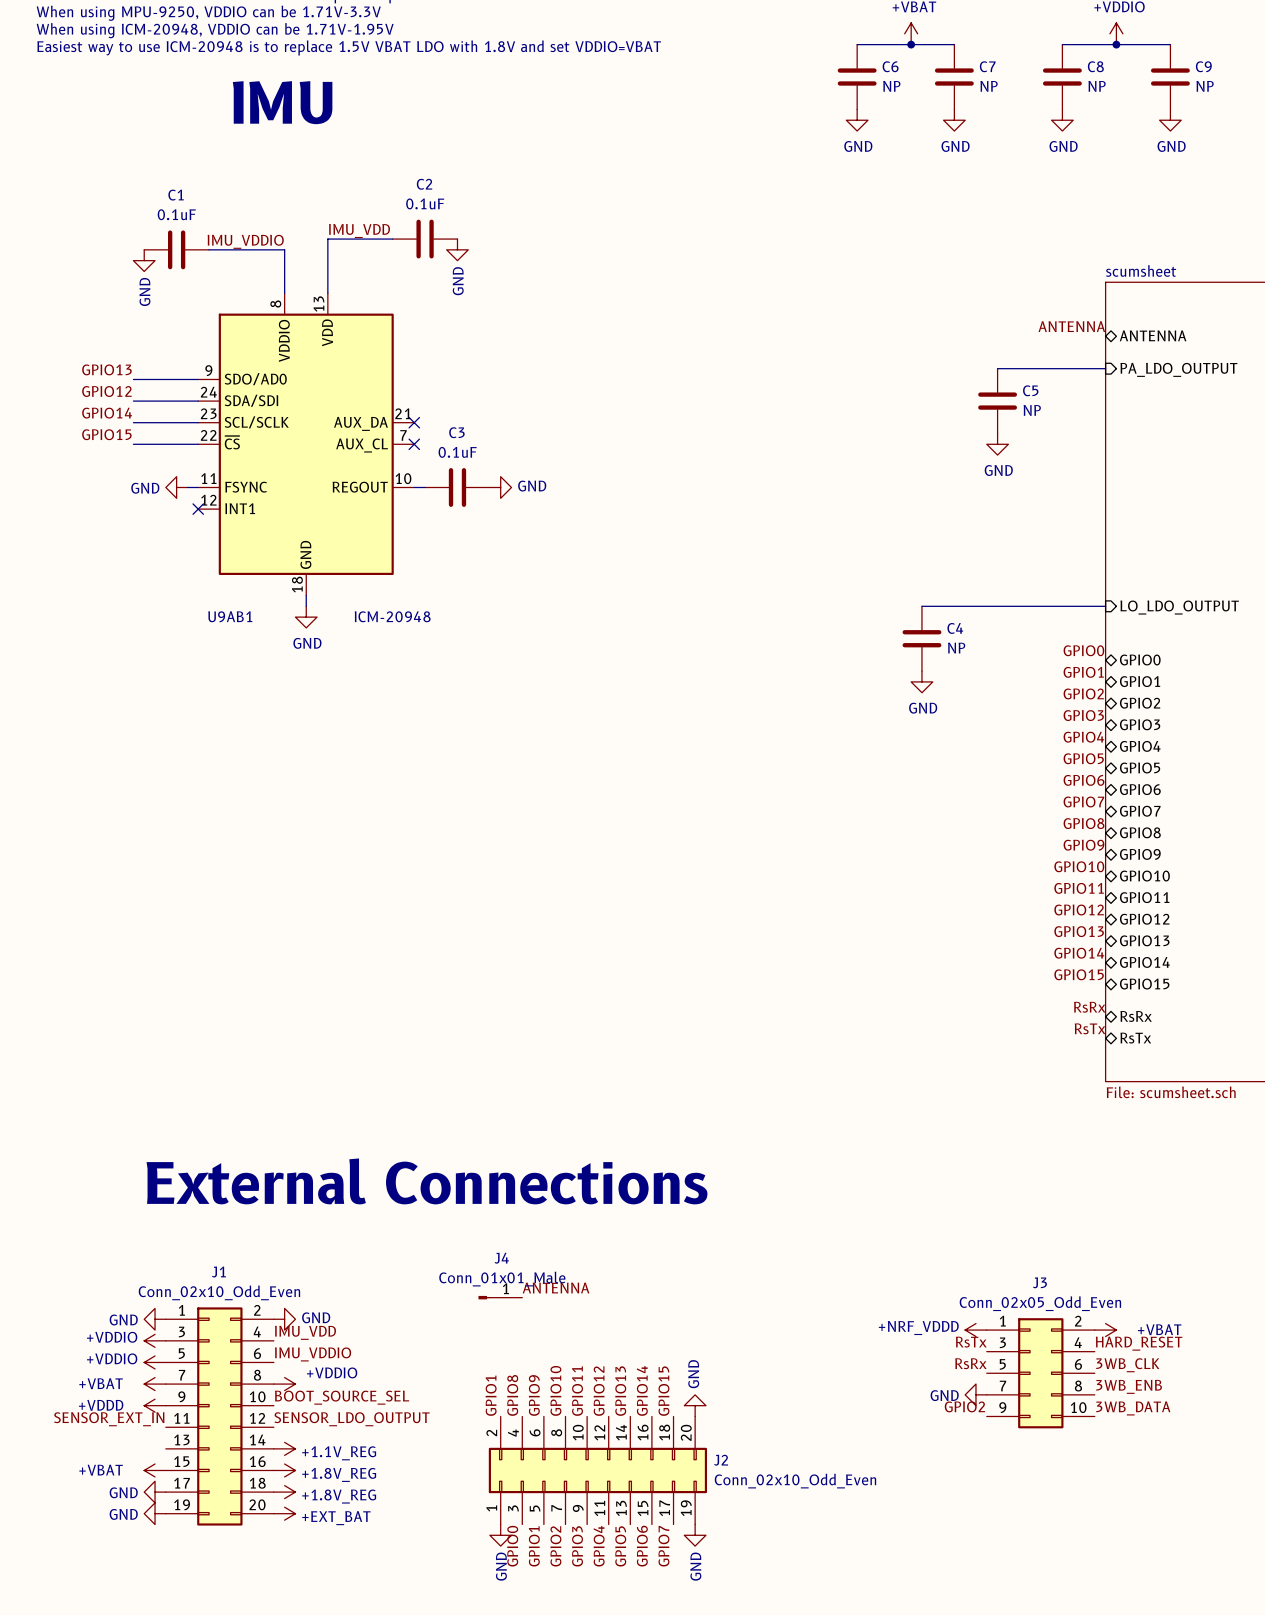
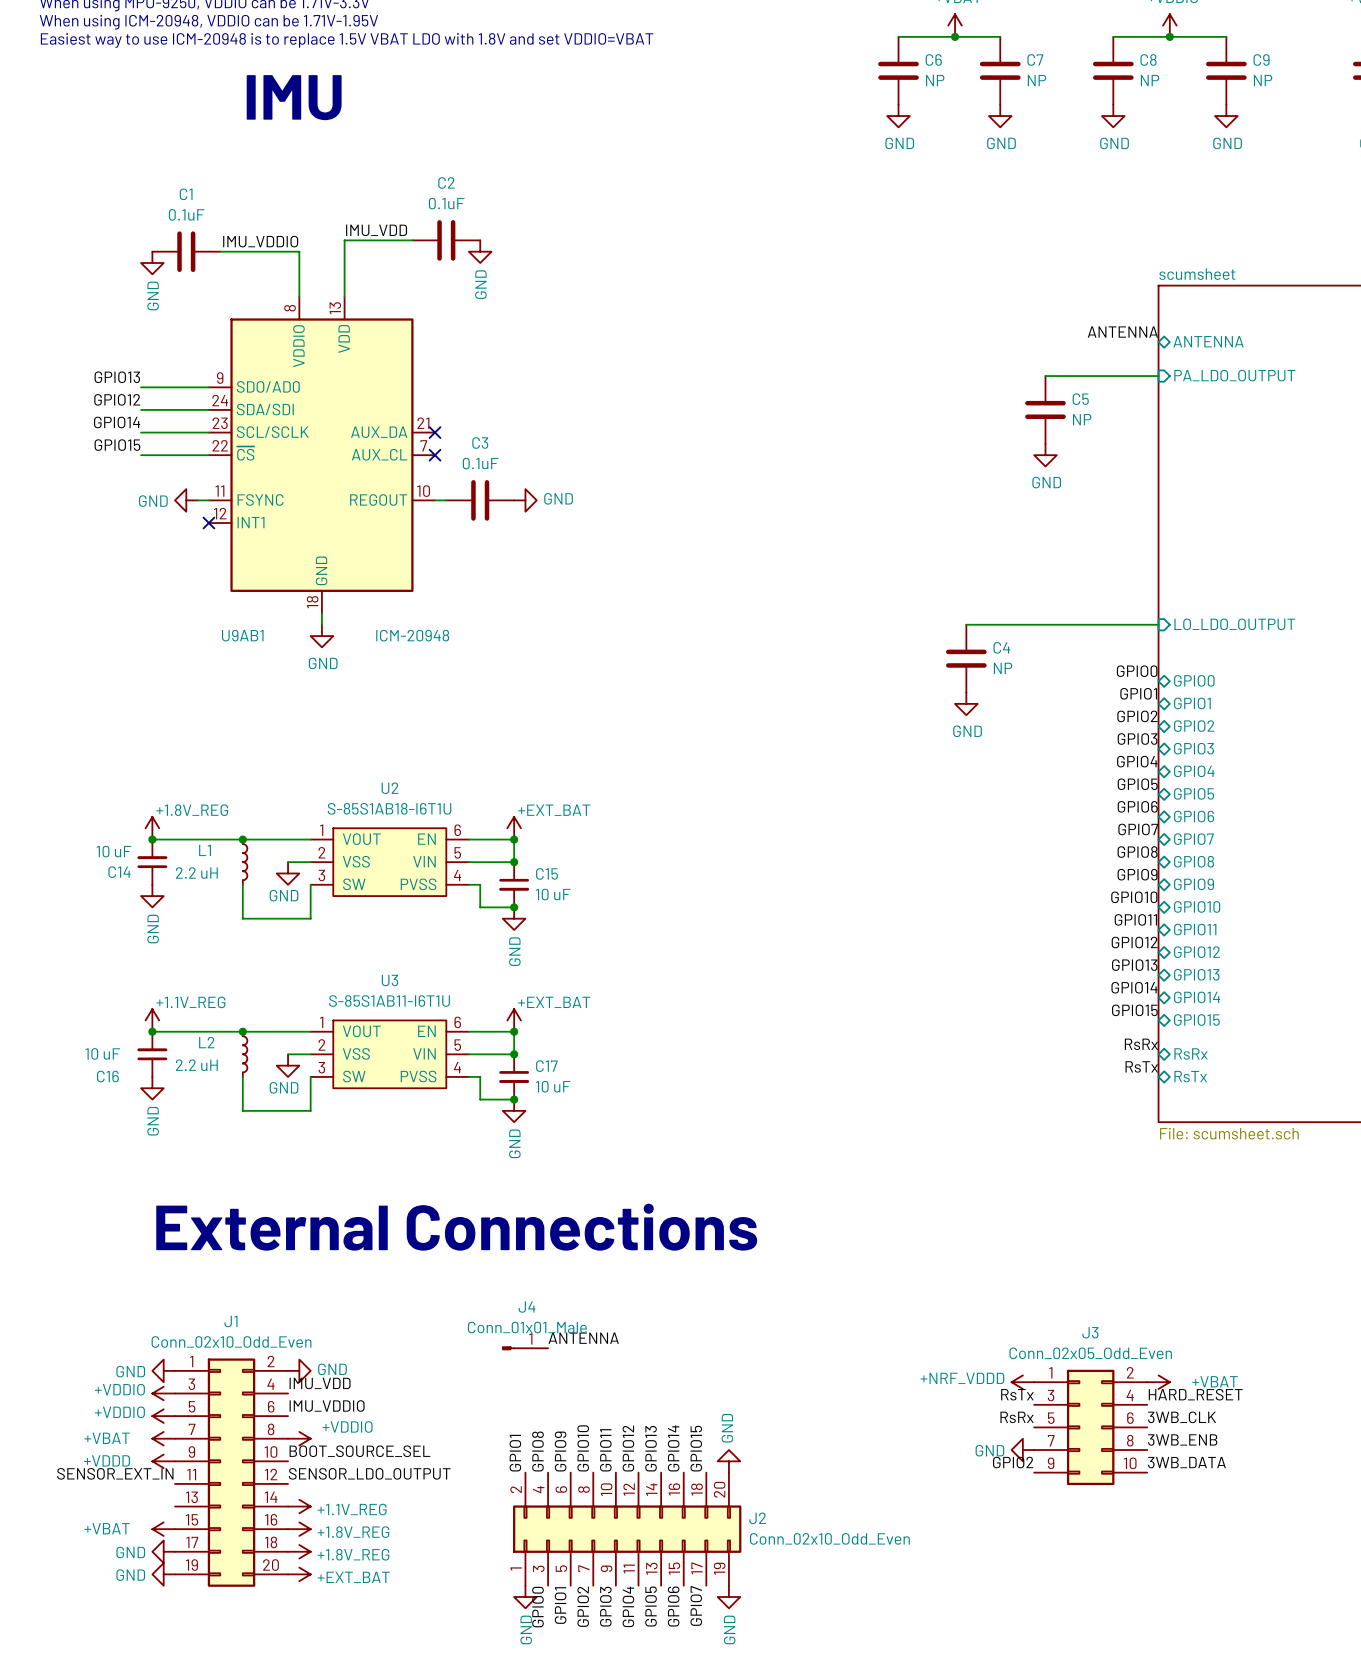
power symbol: none -> +1.8V_REG (152, 828)
power symbol: none -> +EXT_BAT (514, 828)
wire: none -> (152, 839) (310, 839)
junction: none -> (152, 839)
junction: none -> (242, 839)
wire: none -> (468, 839) (514, 839) (514, 862) (468, 862)
junction: none -> (514, 839)
C14: none -> 10 uF (152, 862)
L1: none -> 2.2 uH (245, 862)
wire: none -> (288, 862) (310, 862)
U2: none -> S-85S1AB18-I6T1U (389, 862)
junction: none -> (514, 862)
power symbol: none -> GND (288, 873)
wire: none -> (242, 884) (242, 918) (310, 918) (310, 884)
wire: none -> (468, 884) (480, 884) (480, 907) (514, 907)
C15: none -> 10 uF (514, 884)
power symbol: none -> GND (152, 896)
junction: none -> (514, 907)
power symbol: none -> GND (514, 918)
power symbol: none -> +1.1V_REG (152, 1020)
power symbol: none -> +EXT_BAT (514, 1020)
wire: none -> (152, 1031) (310, 1031)
junction: none -> (152, 1031)
junction: none -> (242, 1031)
wire: none -> (468, 1031) (514, 1031) (514, 1054) (468, 1054)
junction: none -> (514, 1031)
C16: none -> 10 uF (152, 1054)
L2: none -> 2.2 uH (245, 1054)
wire: none -> (288, 1054) (310, 1054)
U3: none -> S-85S1AB11-I6T1U (389, 1054)
junction: none -> (514, 1054)
power symbol: none -> GND (288, 1065)
wire: none -> (242, 1076) (242, 1110) (310, 1110) (310, 1076)
wire: none -> (468, 1076) (480, 1076) (480, 1099) (514, 1099)
C17: none -> 10 uF (514, 1076)
power symbol: none -> GND (152, 1088)
junction: none -> (514, 1099)
power symbol: none -> GND (514, 1110)

